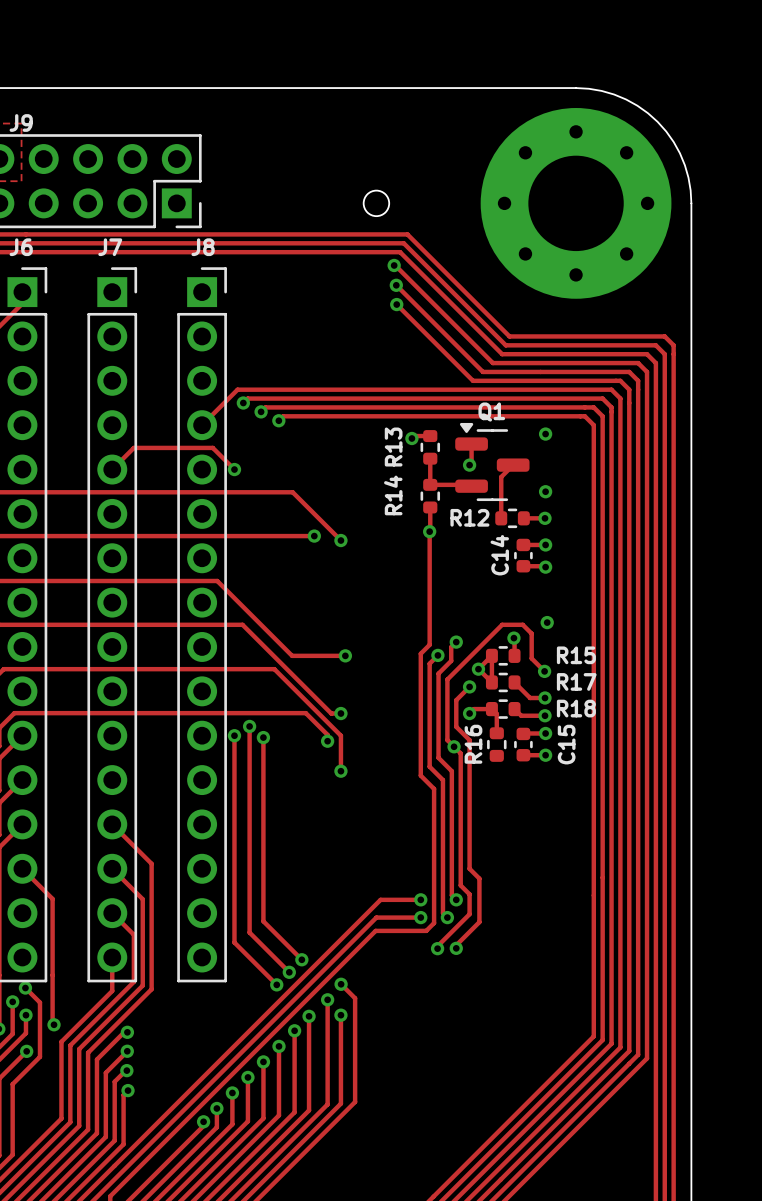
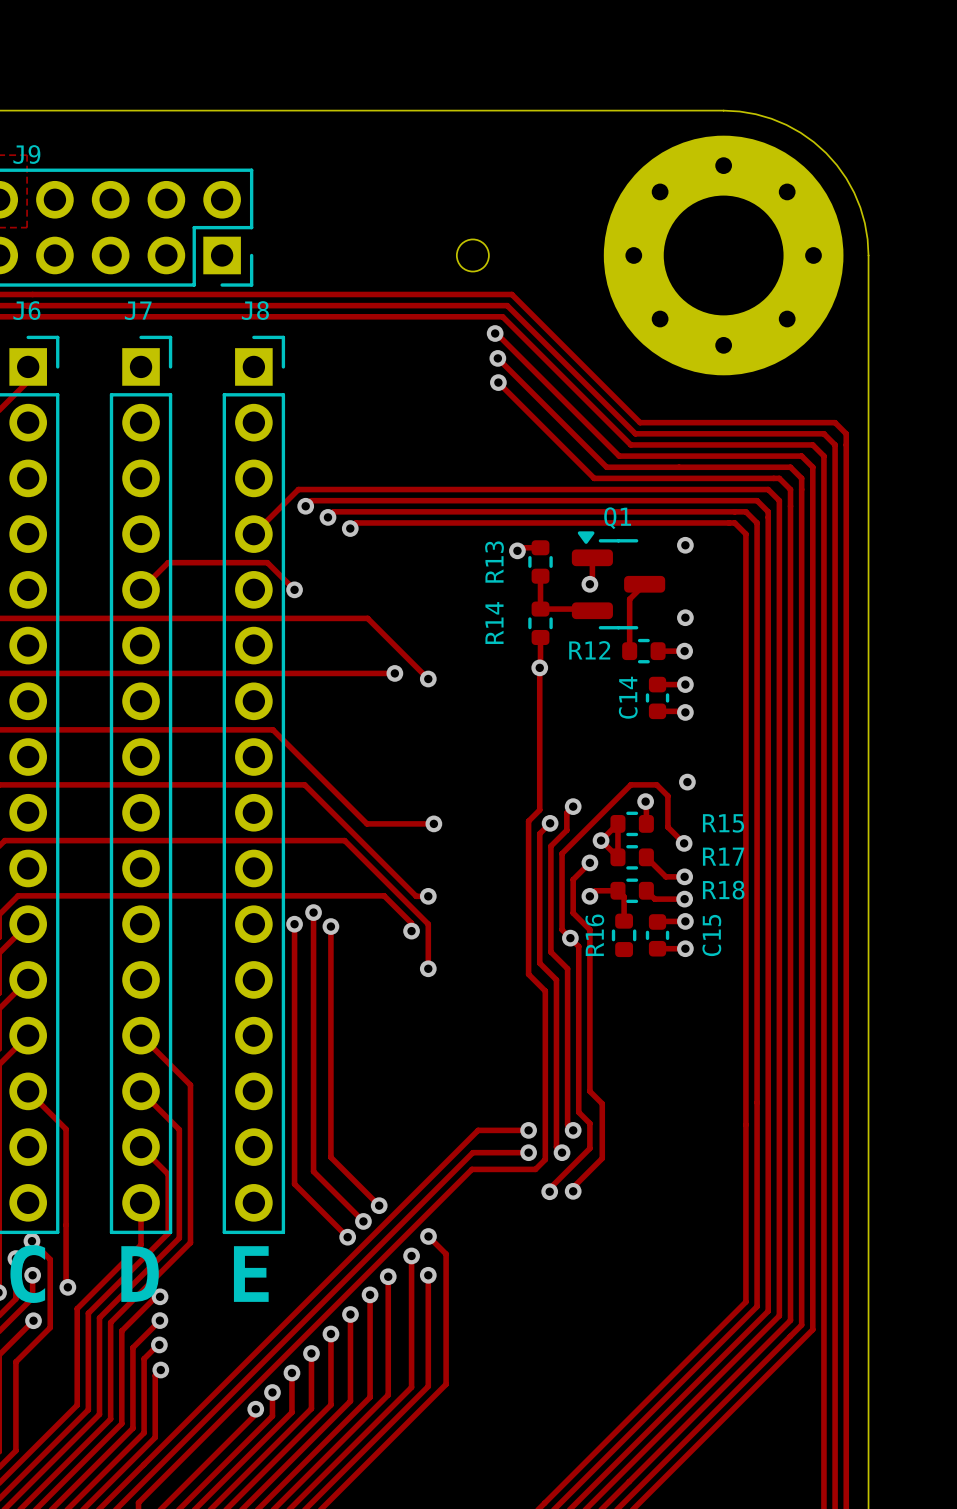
text: none -> C (27, 1274)
text: none -> D (140, 1274)
text: none -> E (251, 1274)

